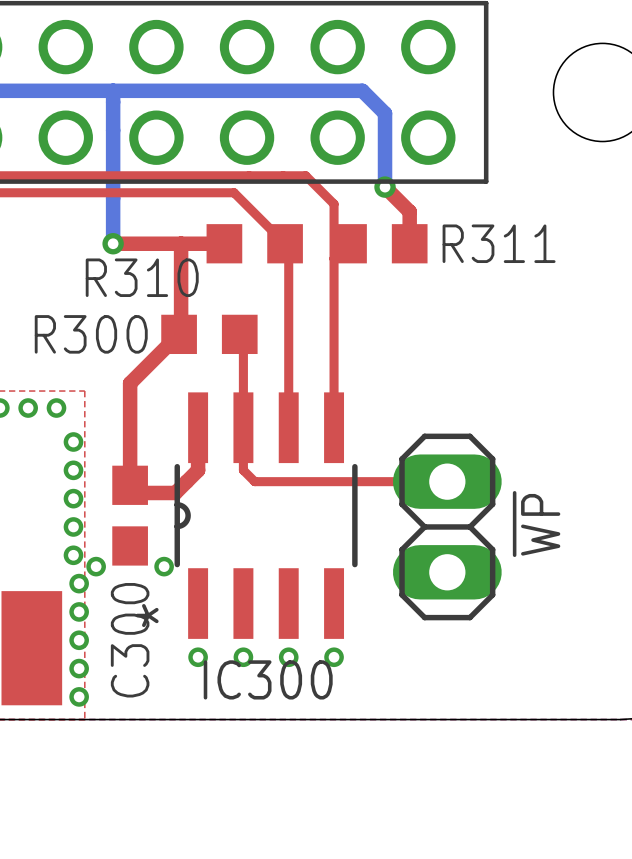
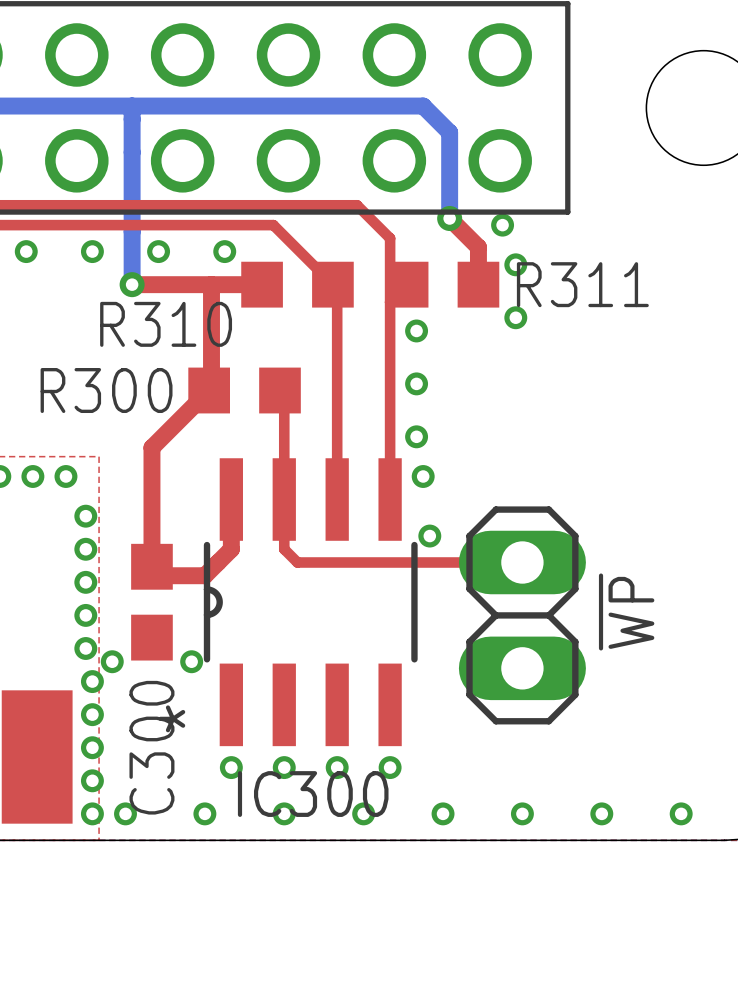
via: none -> (502, 225)
via: none -> (26, 251)
via: none -> (92, 251)
via: none -> (158, 251)
via: none -> (224, 251)
via: none -> (515, 264)
via: none -> (515, 317)
via: none -> (416, 330)
via: none -> (416, 383)
via: none -> (416, 436)
via: none -> (423, 476)
via: none -> (429, 536)
via: none -> (125, 813)
via: none -> (204, 813)
via: none -> (284, 813)
via: none -> (363, 813)
via: none -> (443, 813)
via: none -> (522, 813)
via: none -> (601, 813)
via: none -> (681, 813)

